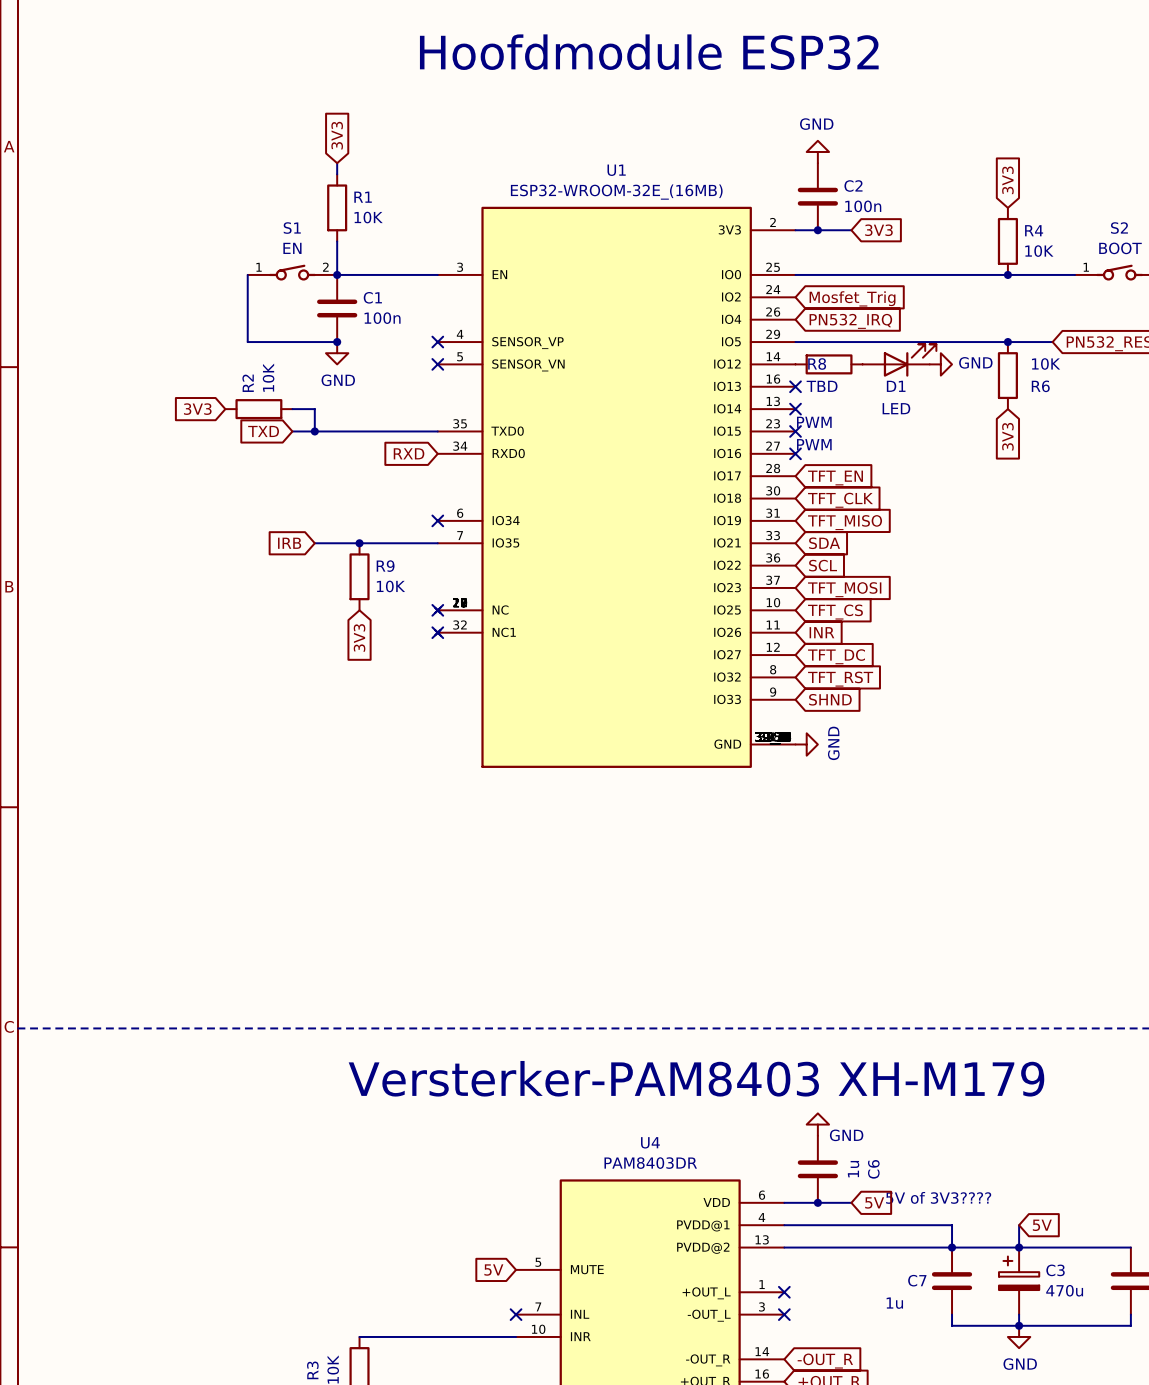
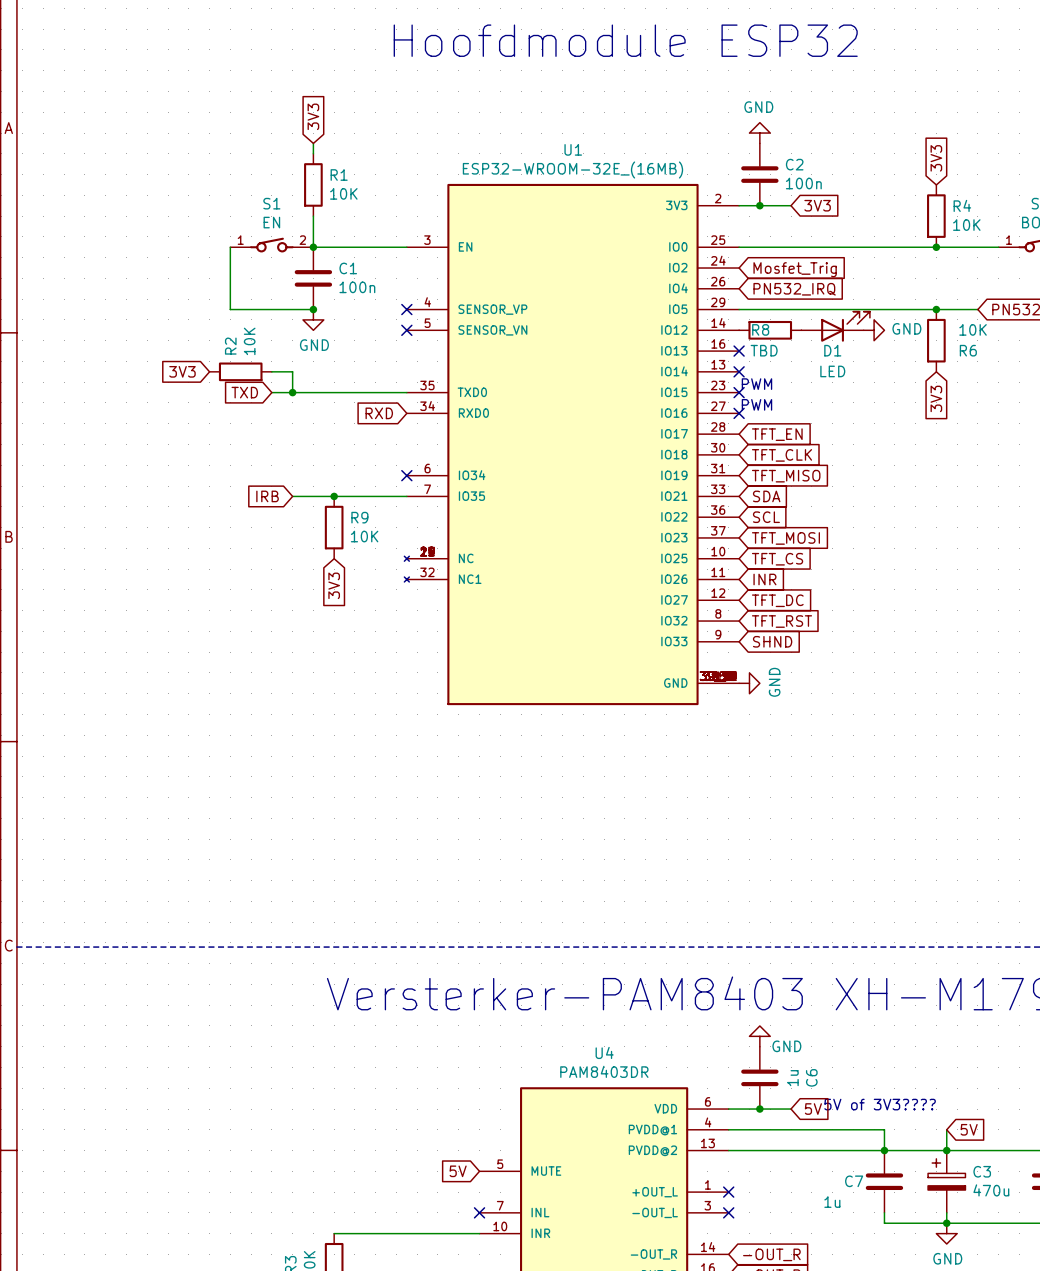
no-connect mark: (437, 610) -> none
no-connect mark: (437, 632) -> none

